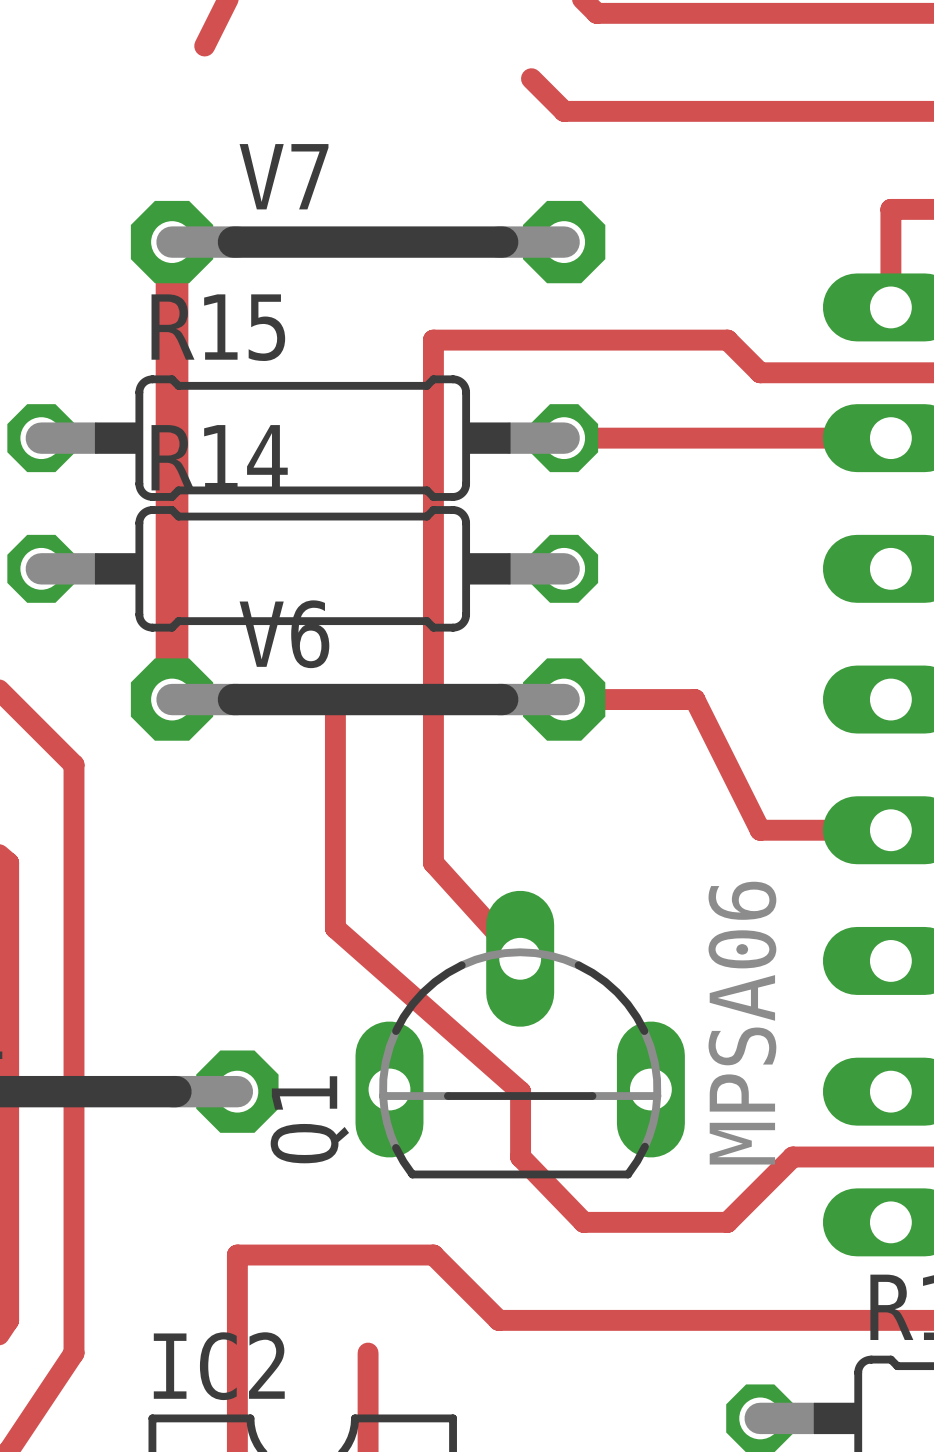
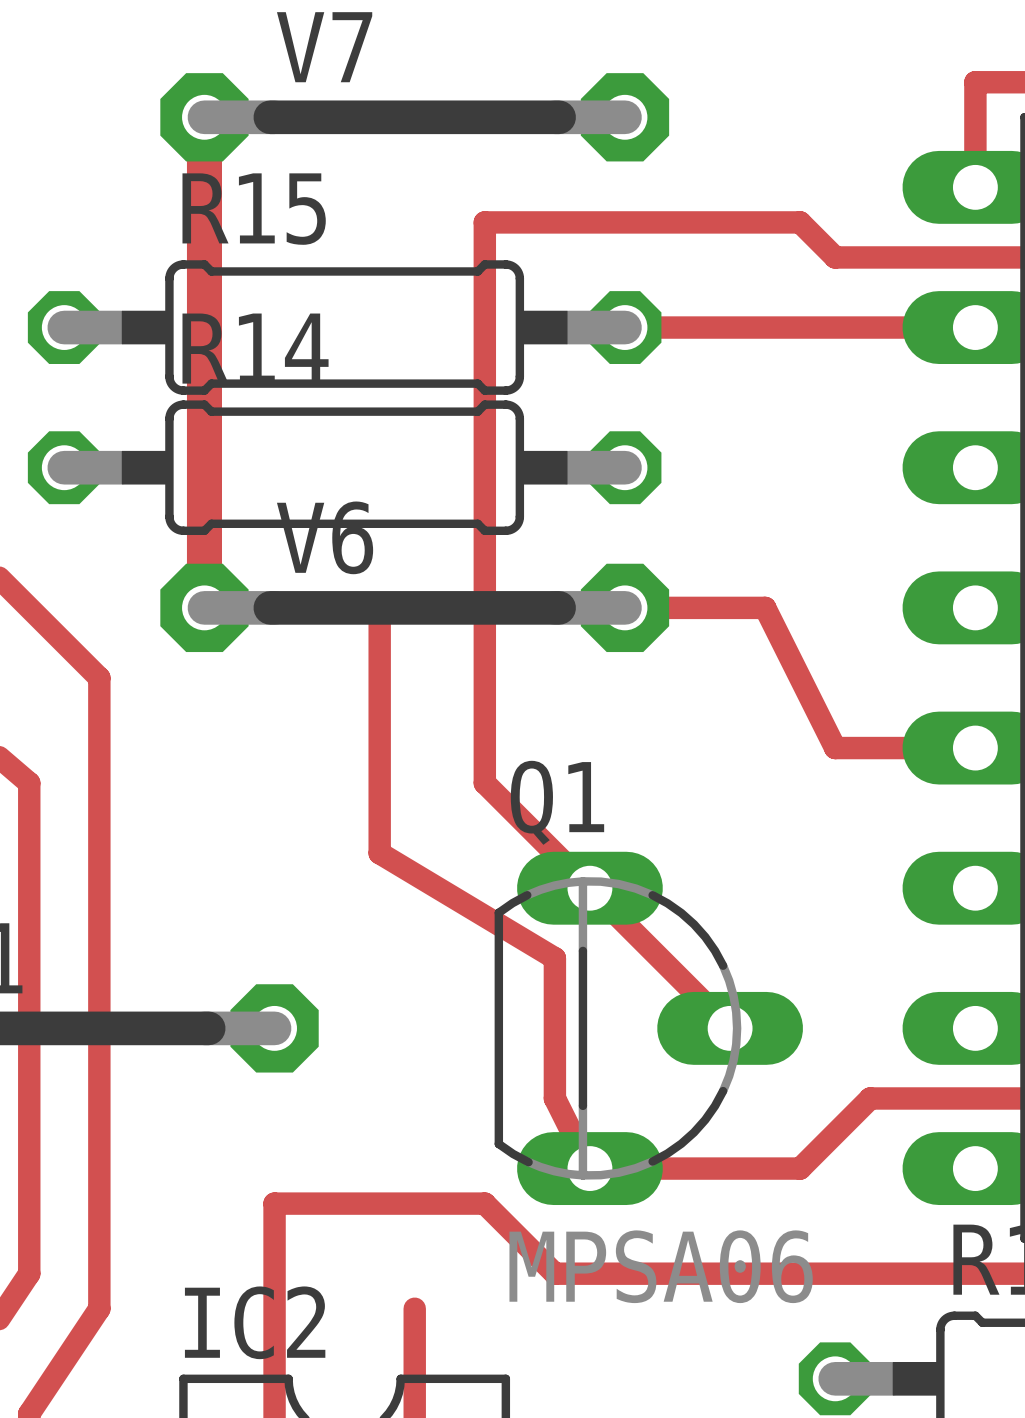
track: (433, 862) (520, 958) -> (484, 783) (730, 1028)
track: (335, 928) (520, 1091) (520, 1157) (583, 1222) -> (379, 853) (554, 958) (554, 1098) (589, 1168) (646, 1168)
Q1 rotation: 0° (520, 1034) -> 90° clockwise (648, 1028)

